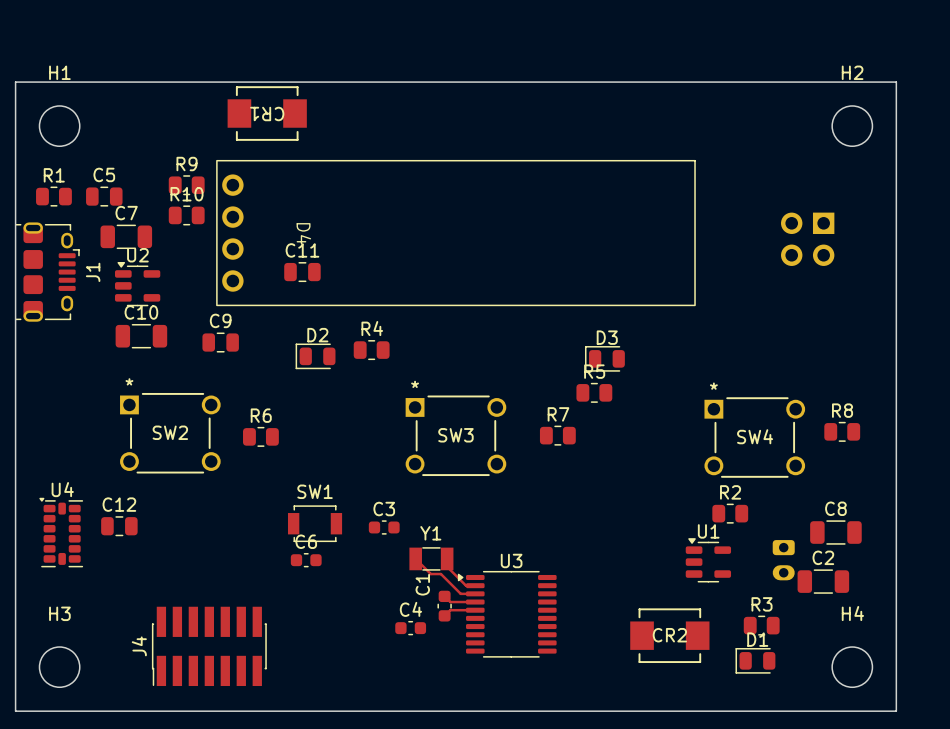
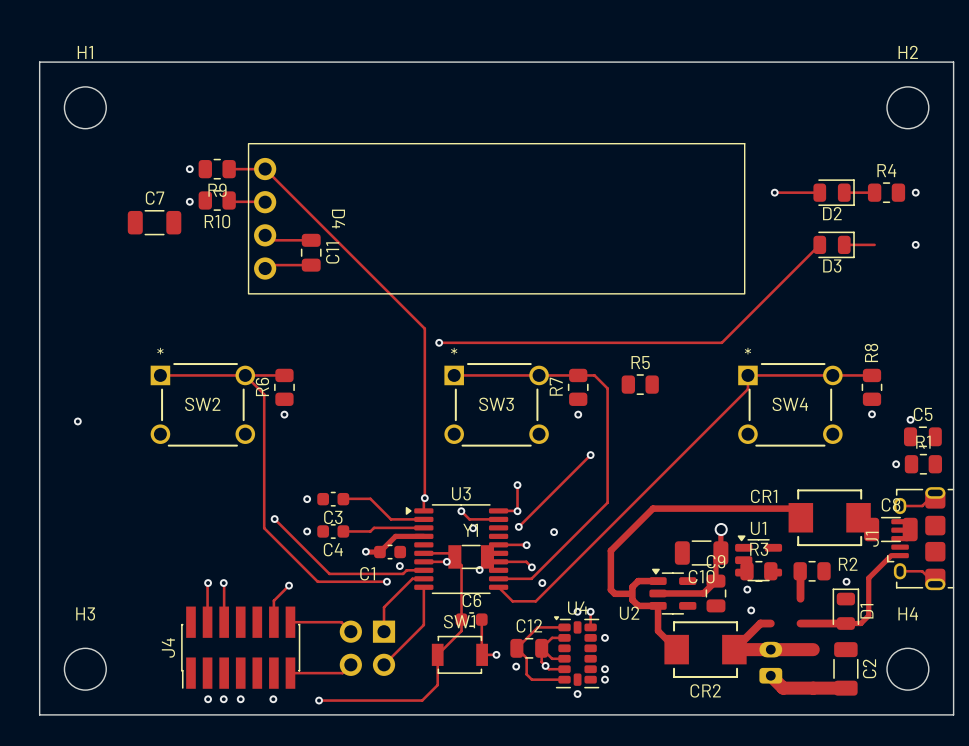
CR1 position: (267, 113) -> (829, 517)
CR1 name rotation: 0° (267, 113) -> 180° (764, 496)
CR1 name position: CR1 (267, 113) -> CR1 (764, 496)
R9 name position: R9 (187, 164) -> R9 (217, 190)
via: none -> (189, 169)
track: none -> (229, 169) (265, 169)
track: none -> (265, 169) (424, 328) (423, 510)
R10 name position: R10 (187, 194) -> R10 (217, 221)
R1 position: (53, 196) -> (923, 464)
C5 position: (104, 196) -> (922, 436)
track: none -> (774, 192) (819, 192)
via: none -> (774, 192)
track: none -> (844, 192) (874, 192)
via: none -> (915, 192)
via: none -> (189, 201)
track: none -> (228, 201) (265, 202)
part: (807, 239) -> none
track: none -> (265, 235) (270, 240) (311, 240)
U2 name position: U2 (137, 255) -> U2 (629, 613)
track: none -> (819, 244) (721, 342) (439, 342)
track: none -> (844, 244) (874, 244)
via: none -> (915, 244)
J1 rotation: 0° (47, 272) -> 180° (920, 538)
J1 position: (47, 272) -> (920, 538)
C11 rotation: 0° (302, 272) -> 90° clockwise (311, 252)
C11 position: (302, 272) -> (311, 252)
track: none -> (311, 265) (268, 265) (265, 268)
U2 position: (137, 284) -> (672, 591)
C10 name position: C10 (141, 312) -> C10 (701, 576)
C10 position: (141, 336) -> (701, 553)
C9 rotation: 0° (220, 342) -> 90° clockwise (715, 593)
C9 position: (220, 342) -> (715, 593)
R4 position: (371, 350) -> (886, 192)
via: none -> (439, 342)
D2 rotation: 0° (315, 356) -> 180° (834, 192)
D2 position: (315, 356) -> (834, 192)
D3 rotation: 0° (604, 358) -> 180° (834, 244)
D3 position: (604, 358) -> (834, 244)
track: none -> (160, 375) (284, 375)
track: none -> (245, 375) (264, 394) (264, 528) (317, 581) (386, 581)
track: none -> (454, 375) (594, 375) (607, 388) (607, 502) (531, 578) (498, 578)
track: none -> (872, 375) (747, 375) (747, 389) (535, 601) (512, 601) (498, 587)
R7 name position: R7 (558, 414) -> R7 (556, 386)
R6 name position: R6 (261, 415) -> R6 (262, 386)
via: none -> (284, 414)
via: none -> (578, 414)
via: none -> (872, 414)
via: none -> (910, 419)
via: none -> (77, 421)
R8 rotation: 0° (842, 431) -> 90° clockwise (872, 387)
R8 position: (842, 431) -> (872, 387)
SW2 position: (170, 433) -> (202, 404)
SW3 position: (455, 435) -> (496, 404)
R7 rotation: 0° (557, 435) -> 90° clockwise (578, 387)
R7 position: (557, 435) -> (578, 387)
R6 rotation: 0° (260, 436) -> 90° clockwise (284, 387)
R6 position: (260, 436) -> (284, 387)
SW4 position: (754, 437) -> (790, 404)
track: none -> (590, 455) (518, 526)
via: none -> (590, 455)
via: none -> (896, 464)
track: none -> (517, 485) (517, 511) (498, 510)
via: none -> (517, 485)
R2 name position: R2 (730, 492) -> R2 (848, 564)
track: none -> (935, 492) (922, 506) (900, 506)
via: none -> (424, 498)
via: none -> (307, 499)
track: none -> (343, 499) (370, 498) (391, 519) (423, 519)
C3 name position: C3 (384, 509) -> C3 (333, 517)
R2 position: (730, 513) -> (812, 571)
track: none -> (461, 511) (469, 519) (498, 519)
via: none -> (461, 511)
via: none -> (517, 511)
track: none -> (800, 517) (791, 508) (652, 508) (610, 550) (610, 589) (614, 593) (629, 593)
track: none -> (274, 519) (329, 573) (403, 573) (406, 570) (423, 570)
via: none -> (274, 519)
SW1 position: (315, 523) -> (459, 654)
C12 position: (119, 526) -> (529, 648)
C3 position: (384, 527) -> (333, 499)
via: none -> (518, 526)
track: none -> (423, 527) (374, 527) (370, 531) (343, 531)
via: none -> (473, 528)
U4 position: (61, 532) -> (576, 652)
track: none -> (721, 529) (720, 553) (715, 557) (715, 581) (703, 593) (658, 593)
via: none -> (721, 529)
via: none -> (307, 531)
via: none -> (554, 532)
track: none -> (423, 536) (395, 536) (379, 552) (365, 551)
track: none -> (498, 544) (526, 545)
via: none -> (526, 545)
via: none -> (365, 551)
track: none -> (423, 553) (449, 553) (461, 565) (461, 631) (437, 654) (437, 685) (422, 700) (319, 700)
track: none -> (891, 555) (868, 578) (868, 615) (860, 623) (800, 623)
track: (415, 558) (430, 574) (440, 574) (460, 593) (475, 593) -> none
track: (447, 558) (447, 566) (466, 585) (475, 585) -> none
C6 position: (306, 560) -> (471, 619)
part rotation: 0° (783, 560) -> 180° (770, 662)
part position: (783, 560) -> (770, 662)
track: none -> (423, 561) (446, 561)
via: none -> (446, 561)
track: none -> (498, 561) (526, 561) (531, 567)
via: none -> (399, 566)
via: none -> (531, 567)
via: none -> (479, 569)
track: none -> (800, 571) (800, 598)
track: none -> (900, 571) (922, 571) (935, 584)
track: none -> (423, 578) (412, 578) (384, 607) (384, 631)
C2 rotation: 0° (823, 581) -> 90° clockwise (845, 668)
C2 position: (823, 581) -> (845, 668)
via: none -> (386, 581)
track: none -> (658, 581) (638, 581) (632, 586) (632, 600) (638, 605) (658, 605) (658, 630) (676, 649)
via: none -> (846, 581)
track: none -> (208, 583) (207, 622)
via: none -> (208, 583)
track: none -> (223, 583) (224, 622)
via: none -> (223, 583)
C1 name position: C1 (422, 584) -> C1 (367, 573)
via: none -> (542, 583)
track: none -> (289, 585) (273, 600) (273, 622)
via: none -> (289, 585)
track: none -> (423, 587) (423, 625) (384, 664)
via: none -> (747, 589)
track: (444, 596) (450, 602) (475, 602) -> none
C1 rotation: 0° (444, 606) -> 90° clockwise (390, 552)
C1 position: (444, 606) -> (390, 552)
C4 name position: C4 (410, 609) -> C4 (333, 549)
track: (475, 610) (450, 610) (444, 615) -> none
via: none -> (751, 610)
via: none -> (577, 611)
track: none -> (590, 611) (590, 627)
via: none -> (590, 611)
U3 position: (507, 614) -> (456, 549)
track: none -> (481, 619) (481, 654) (496, 654)
track: none -> (290, 622) (341, 622) (350, 631)
track: none -> (770, 623) (760, 623) (734, 649) (813, 649)
R3 position: (761, 625) -> (758, 571)
track: none -> (564, 627) (537, 627) (516, 648) (526, 658) (526, 674) (531, 679) (564, 679)
C4 position: (410, 628) -> (333, 531)
CR2 position: (669, 635) -> (705, 649)
CR2 name position: CR2 (669, 635) -> CR2 (705, 690)
track: none -> (564, 637) (552, 637) (541, 648)
via: none -> (604, 637)
part: none -> (367, 648)
track: none -> (541, 648) (541, 662) (548, 669) (564, 669)
track: none -> (541, 648) (552, 658) (564, 658)
via: none -> (496, 654)
D1 rotation: 0° (755, 660) -> 90° clockwise (845, 609)
D1 position: (755, 660) -> (845, 609)
track: none -> (350, 664) (342, 673) (290, 673)
via: none -> (545, 665)
via: none -> (516, 666)
via: none -> (604, 669)
track: none -> (770, 675) (783, 688) (845, 688)
via: none -> (604, 679)
via: none -> (577, 694)
via: none -> (208, 699)
via: none -> (223, 699)
via: none -> (240, 699)
via: none -> (273, 699)
via: none -> (319, 700)

